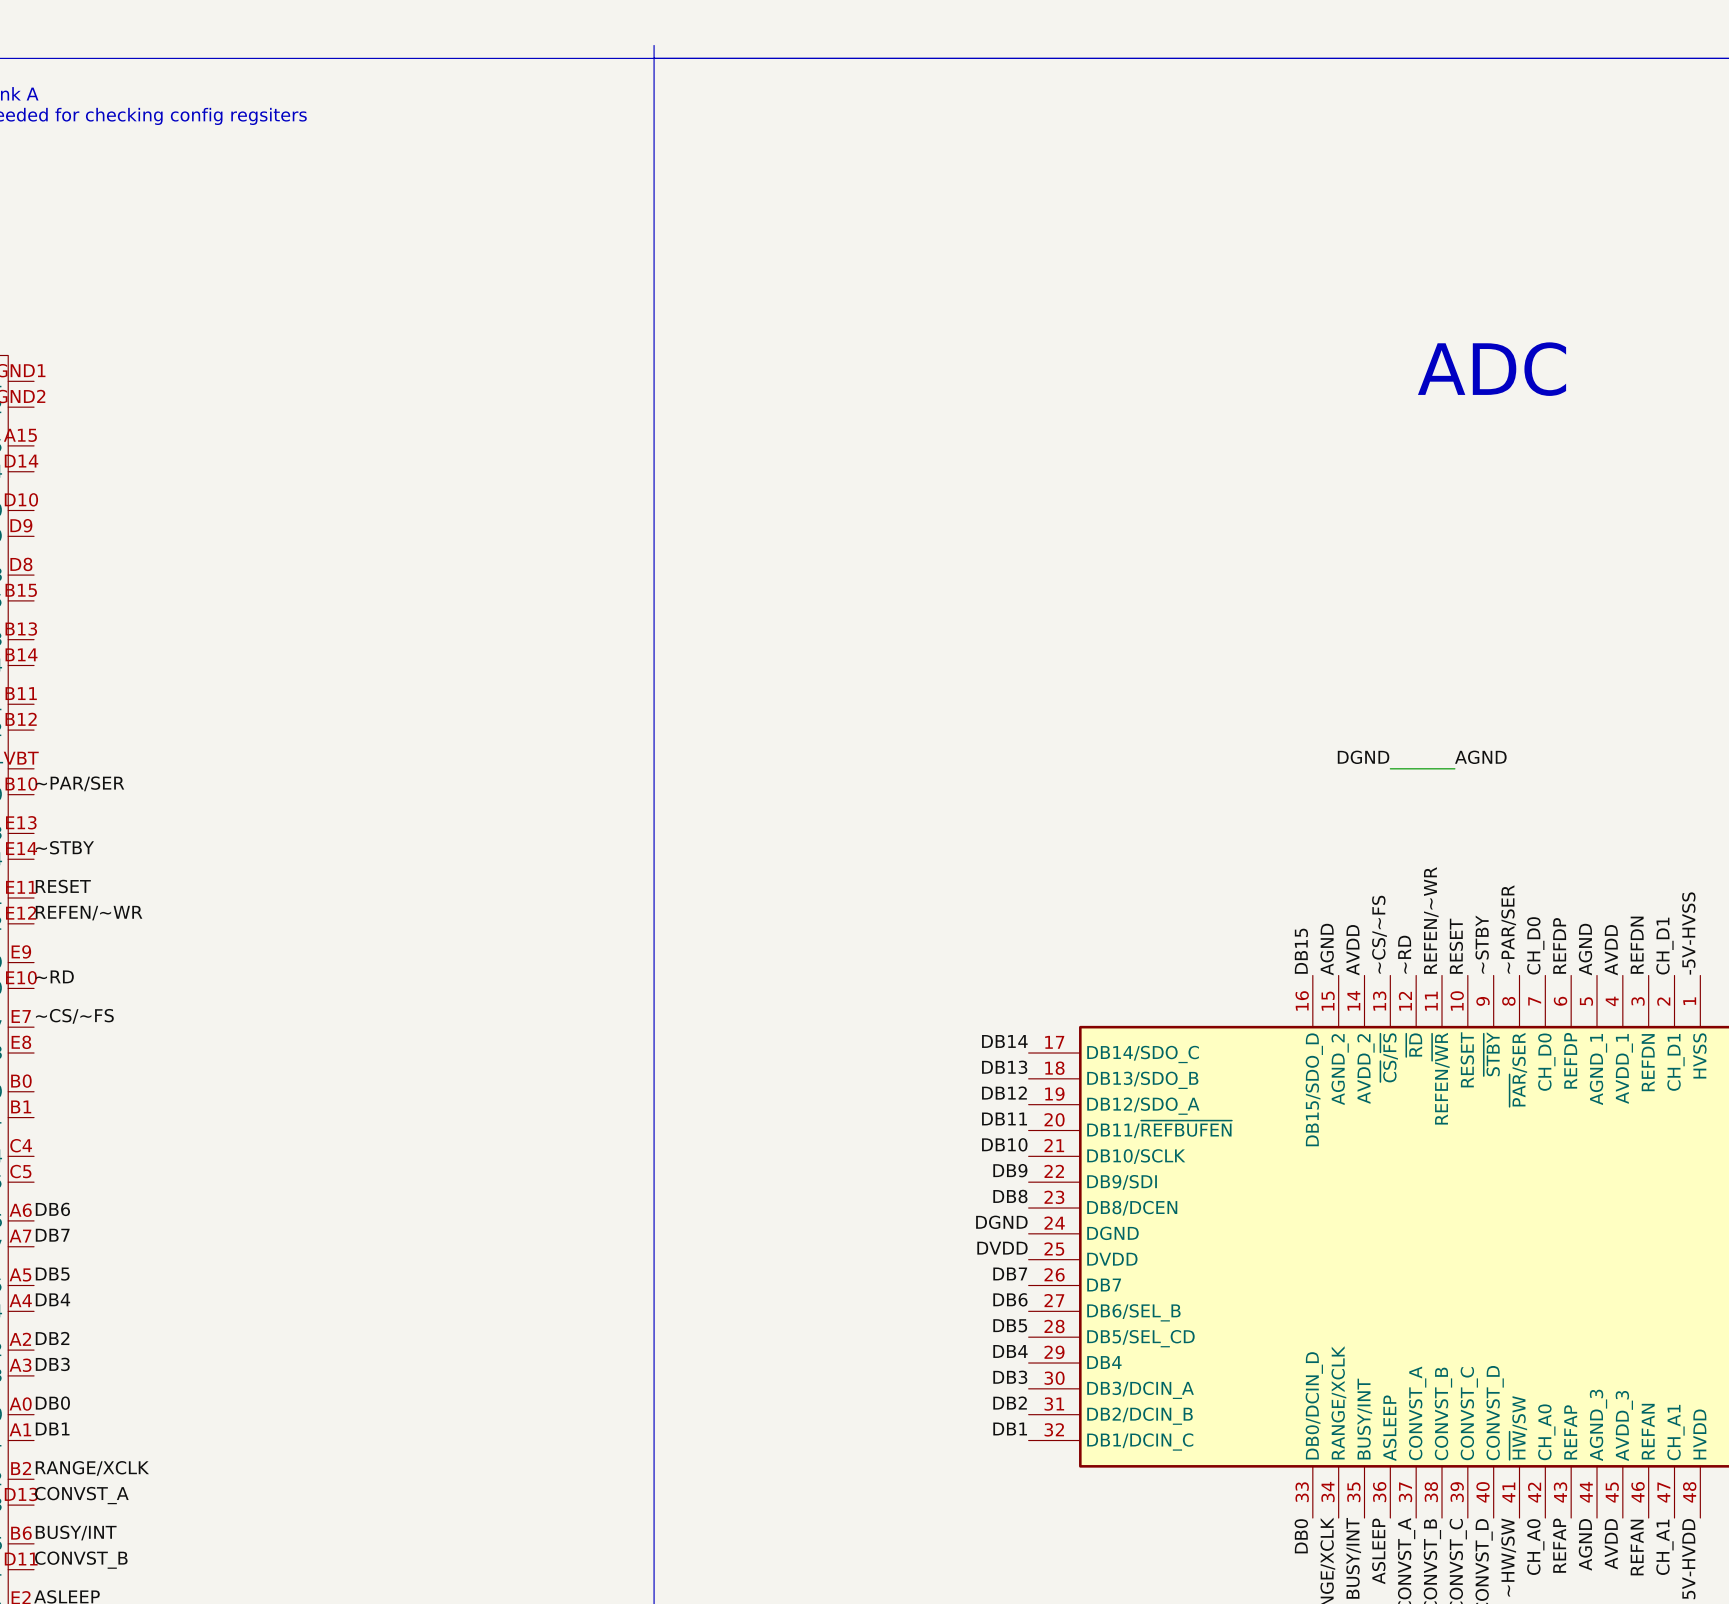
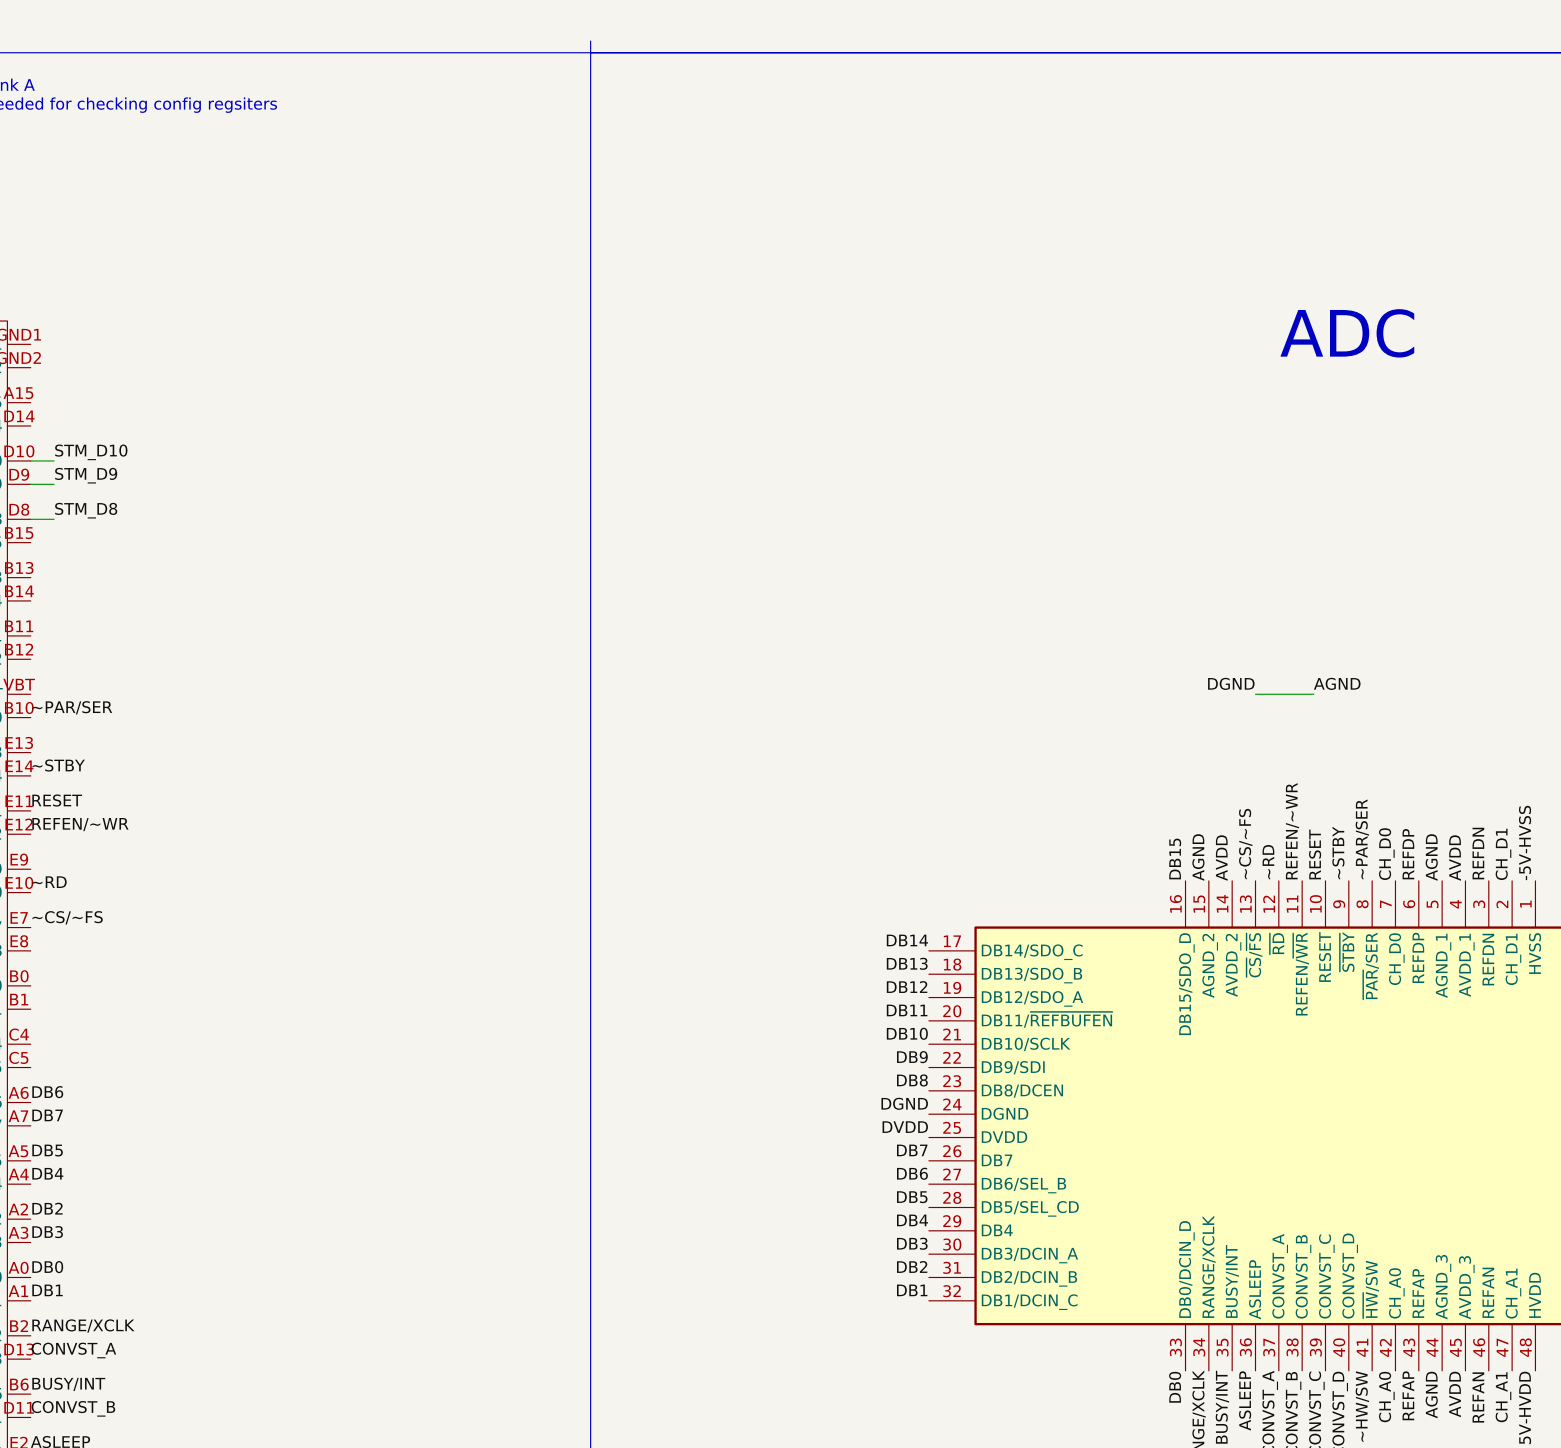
label: none -> STM_D10 (91, 452)
wire: none -> (30, 460) (54, 460)
label: none -> STM_D9 (86, 475)
wire: none -> (30, 484) (54, 484)
label: none -> STM_D8 (86, 510)
wire: none -> (30, 519) (54, 519)

